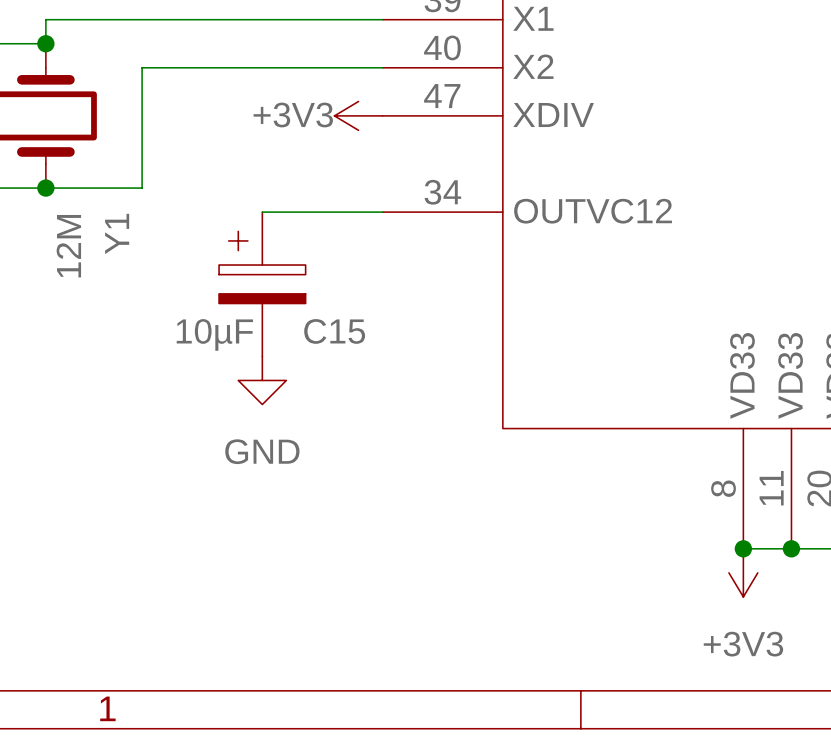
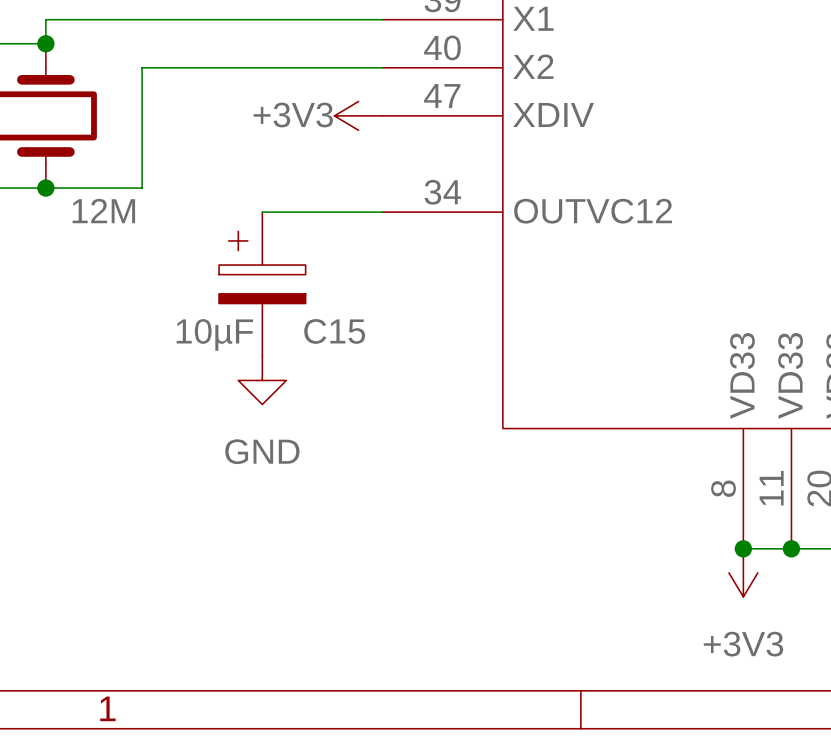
Y1 name: Y1 (117, 233) -> none
Y1 value rotation: 0° (68, 246) -> 90° clockwise (103, 211)

